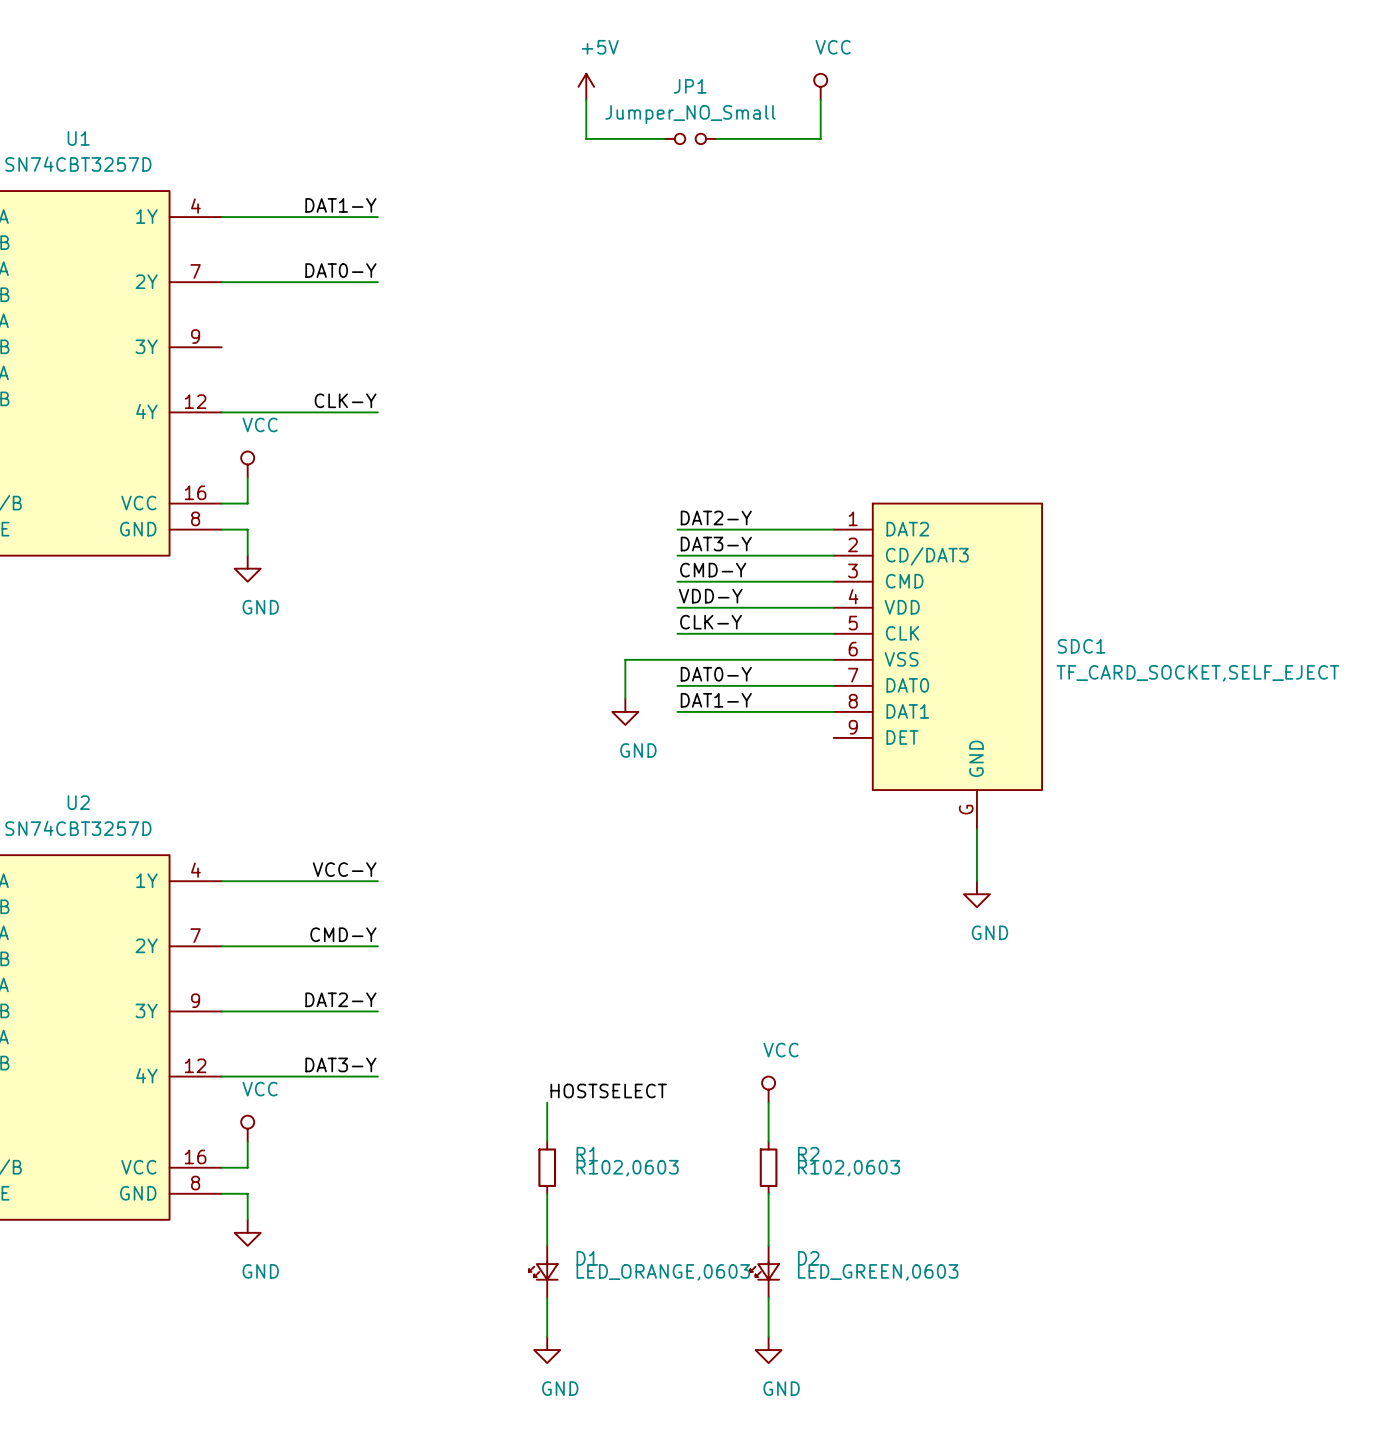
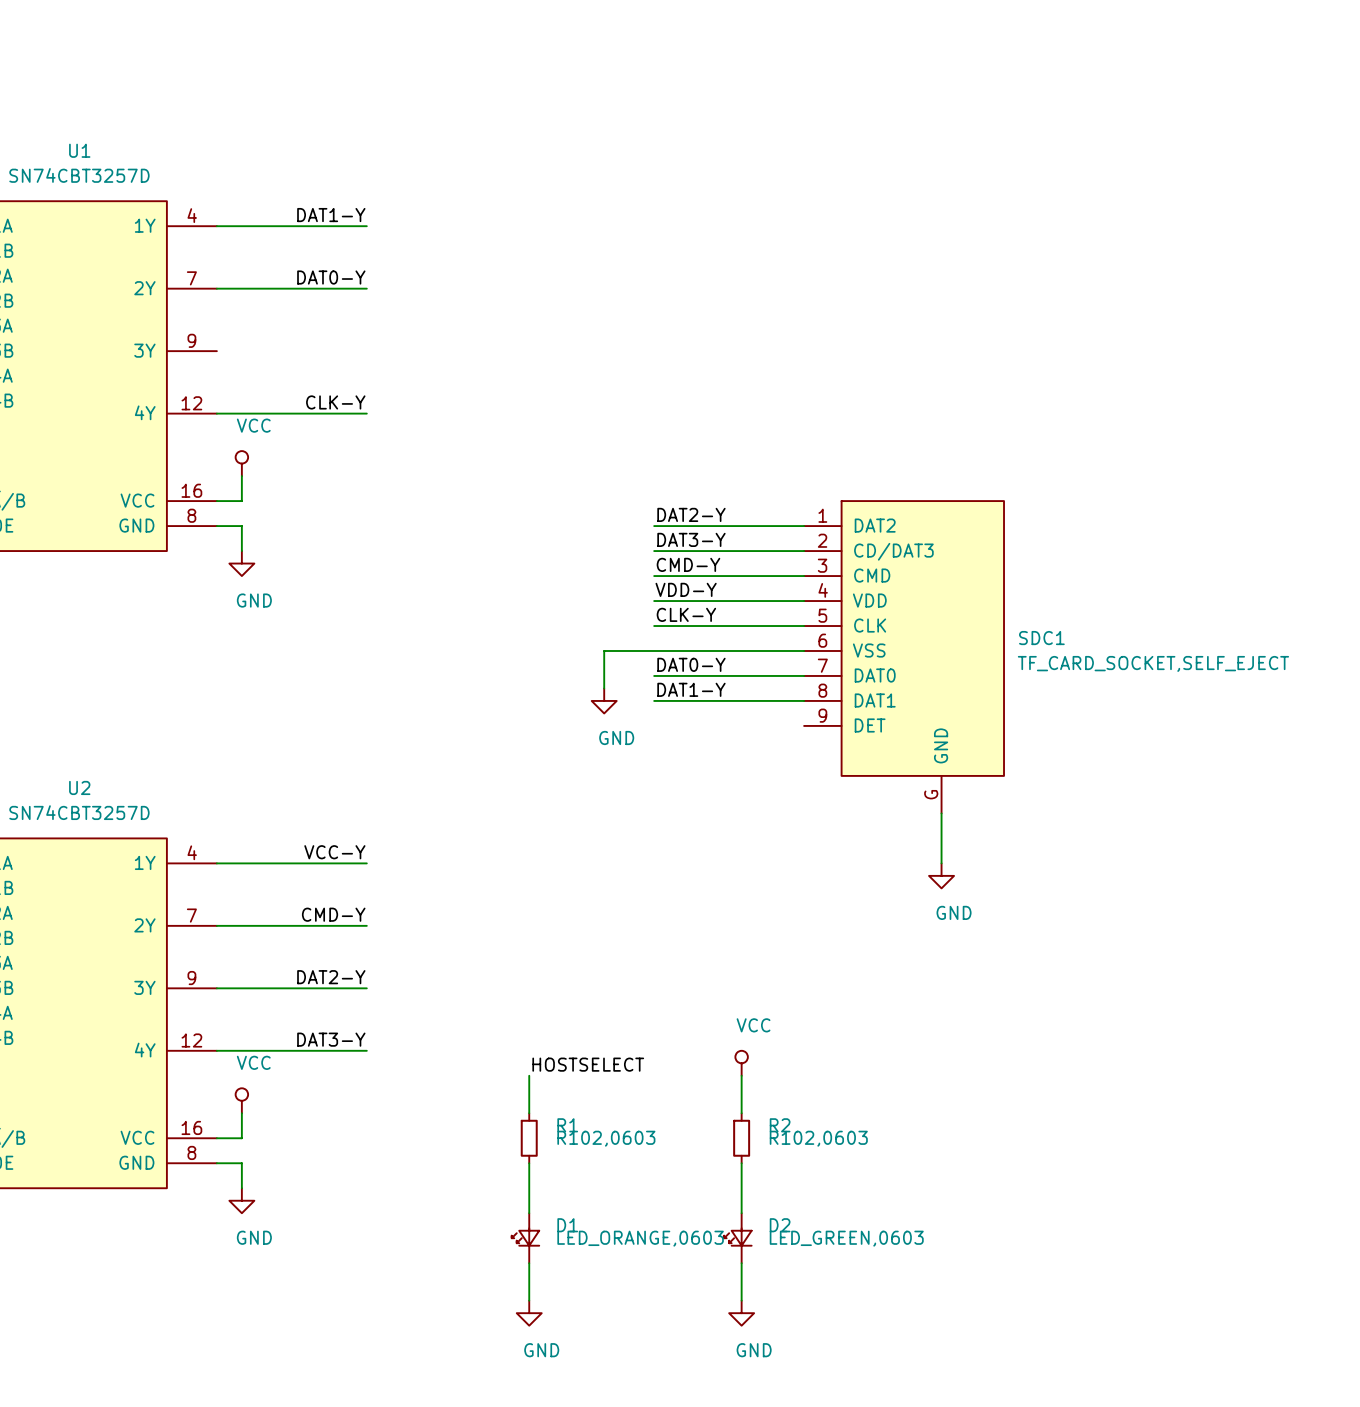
power symbol: +5V (586, 86) -> none
power symbol: VCC (820, 86) -> none
wire: (586, 99) (586, 138) (664, 138) -> none
wire: (820, 99) (820, 138) (716, 138) -> none
JP1: Jumper_NO_Small (690, 138) -> none

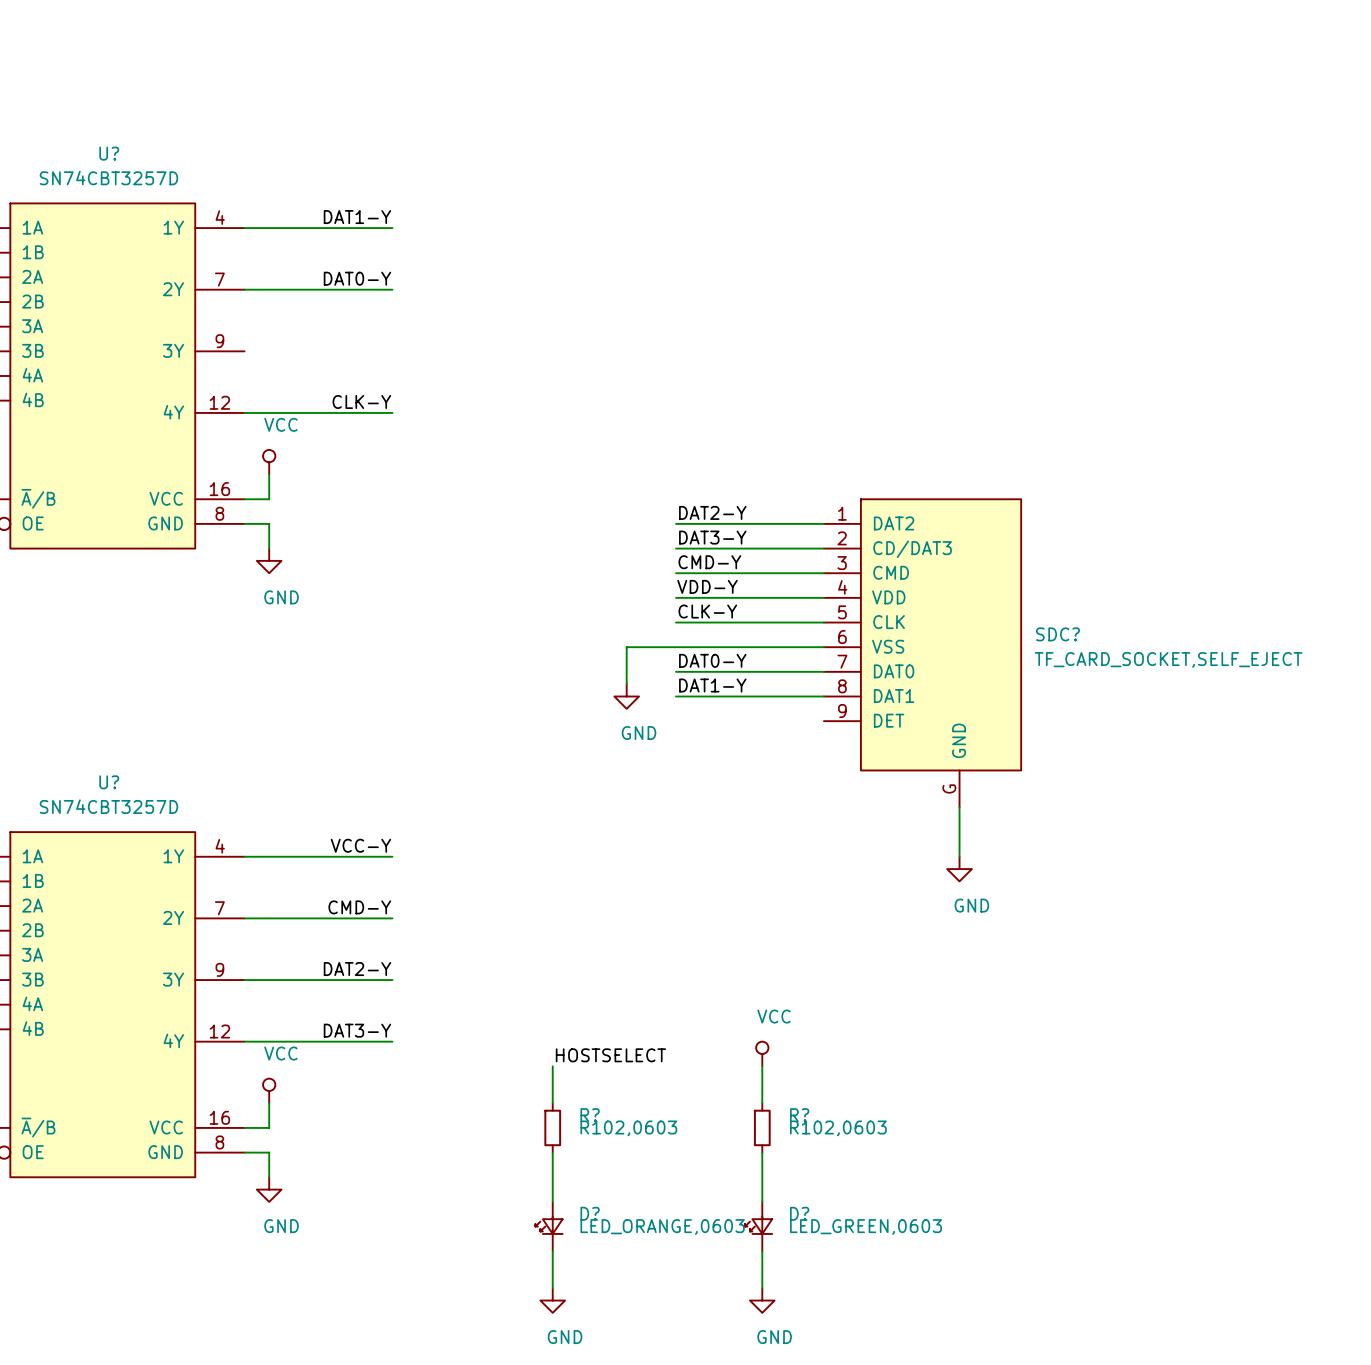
U1 name: U1 (79, 150) -> U? (109, 153)
SDC1 name: SDC1 (1041, 638) -> SDC? (1057, 634)
U2 name: U2 (79, 787) -> U? (109, 782)
R1 name: R1 (567, 1125) -> R? (590, 1115)
R2 name: R2 (780, 1125) -> R? (799, 1115)
D1 name: D1 (567, 1225) -> D? (590, 1213)
D2 name: D2 (780, 1225) -> D? (799, 1213)

